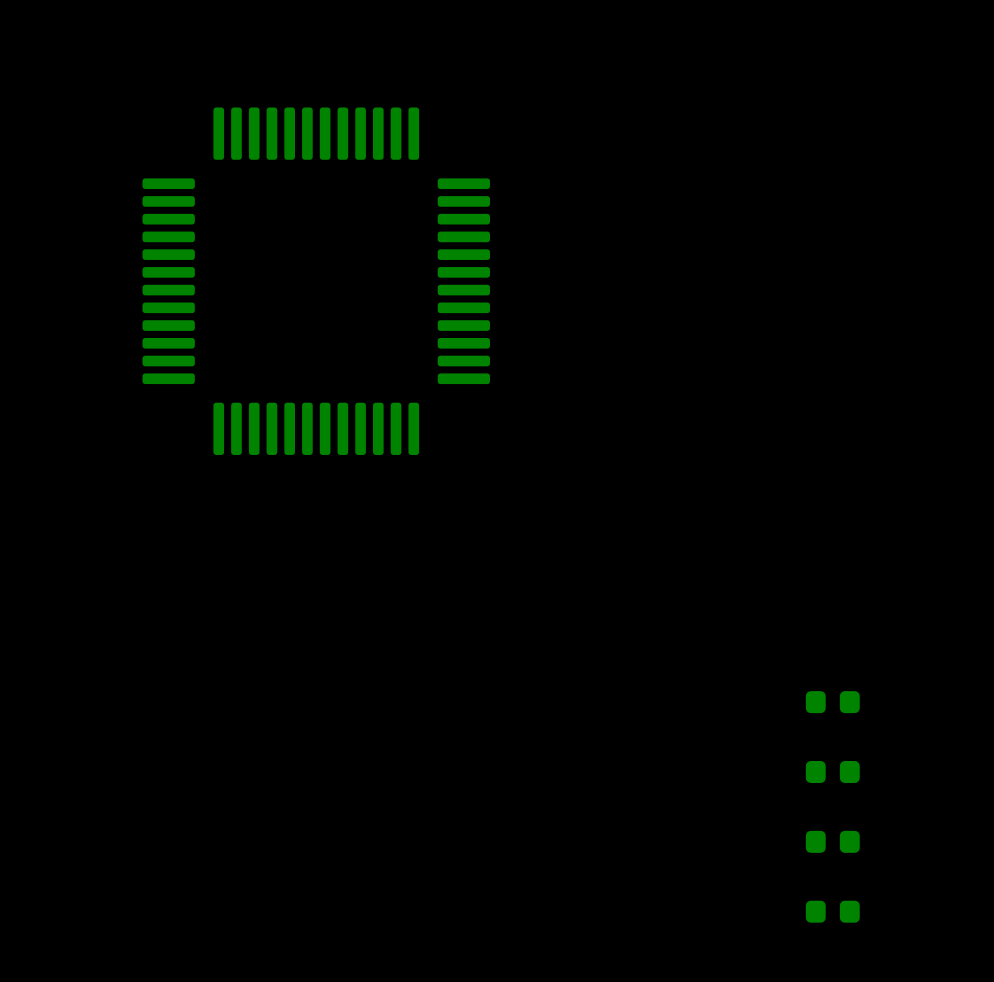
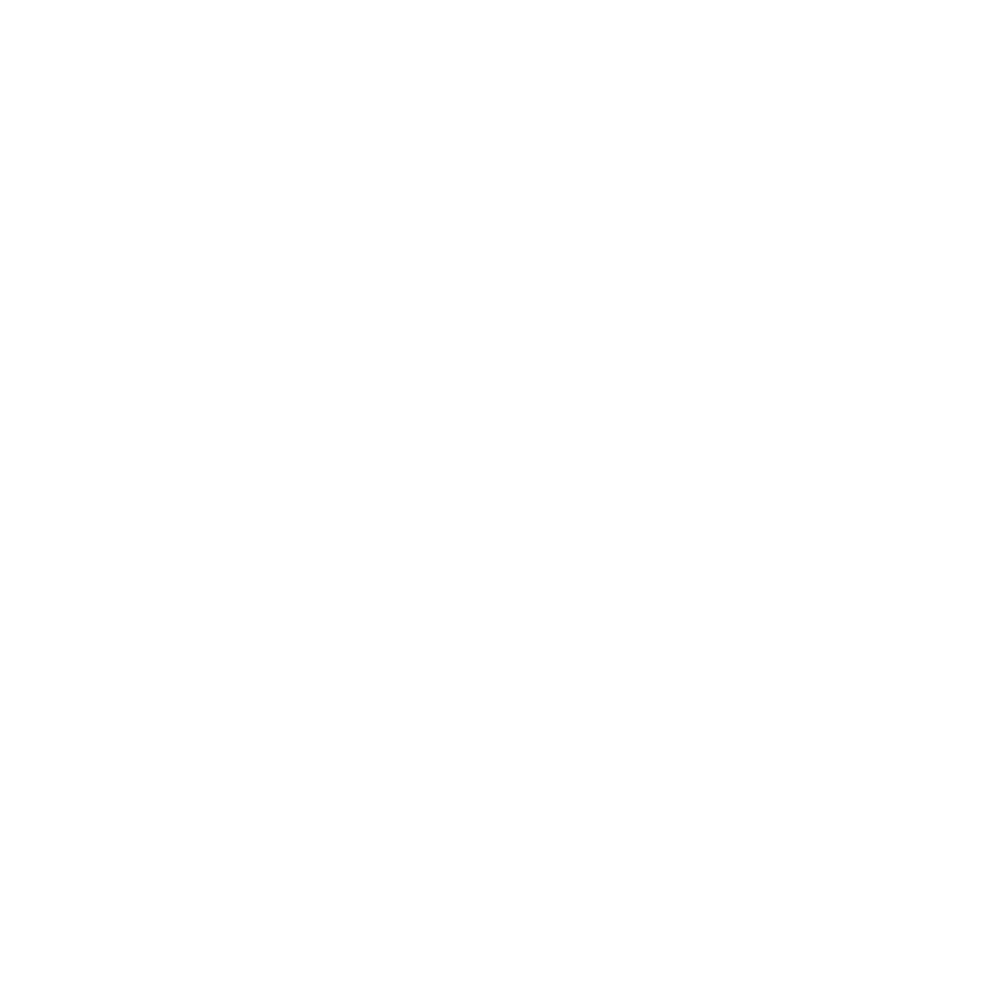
part: (316, 281) -> none
part: (832, 702) -> none
part: (832, 771) -> none
part: (832, 841) -> none
part: (832, 911) -> none

